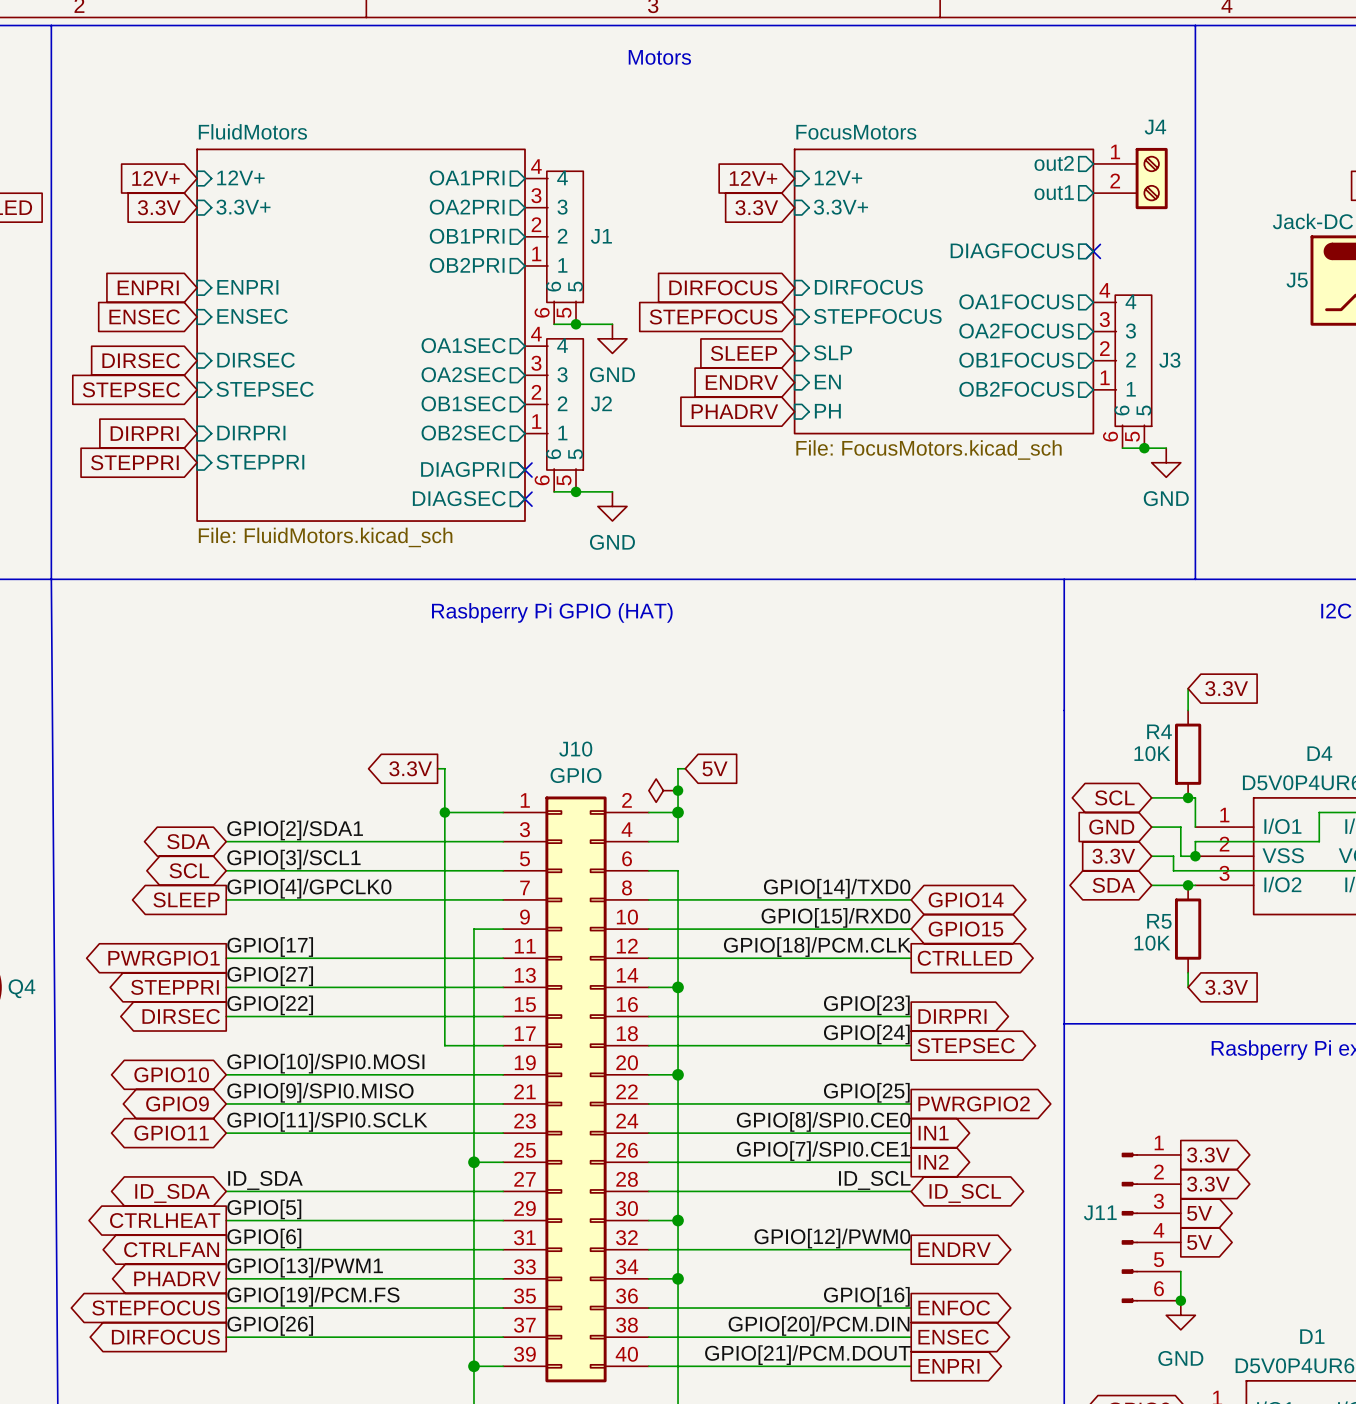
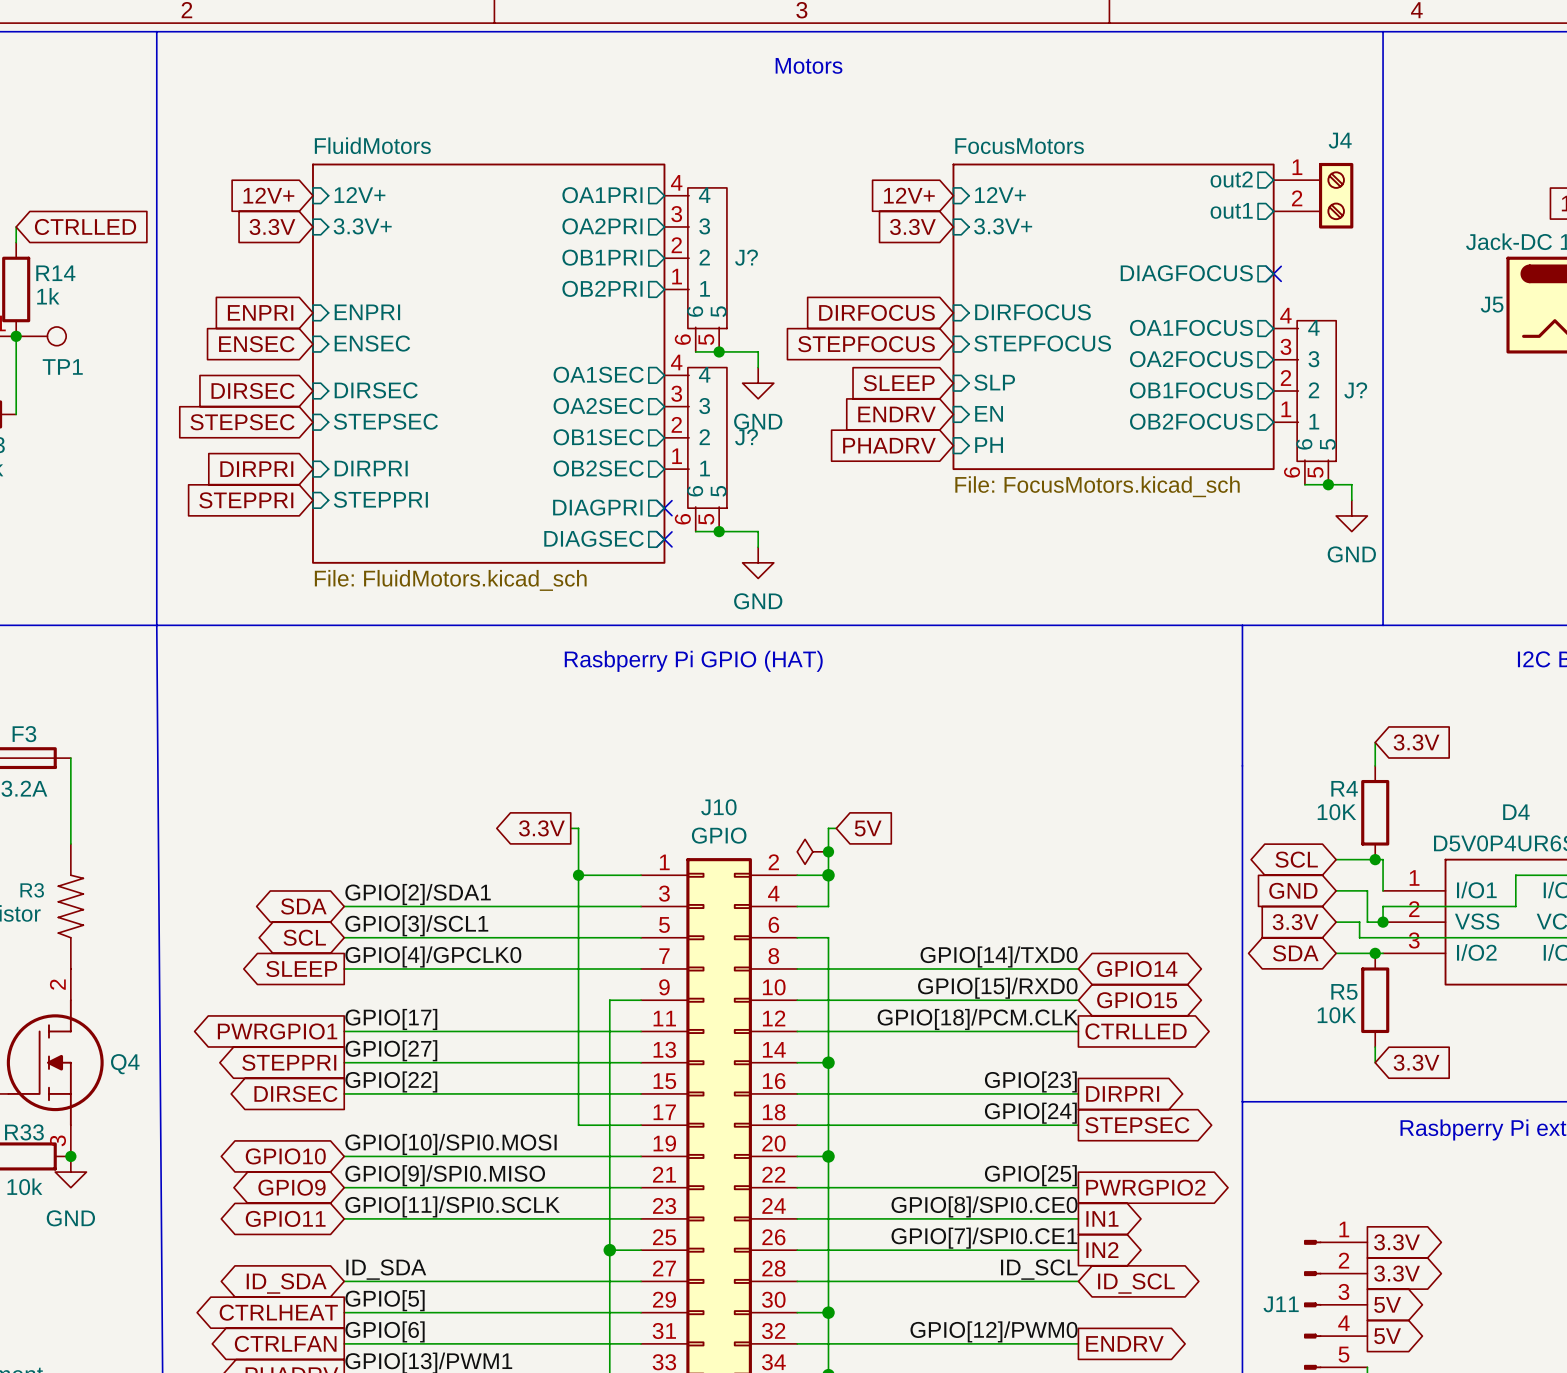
J1 name: J1 (601, 236) -> J? (746, 257)
power symbol position: GND (612, 338) -> GND (758, 383)
J3 name: J3 (1169, 360) -> J? (1355, 390)
J2 name: J2 (601, 403) -> J? (746, 437)
power symbol position: GND (1166, 462) -> GND (1351, 515)
power symbol position: GND (612, 506) -> GND (758, 562)

